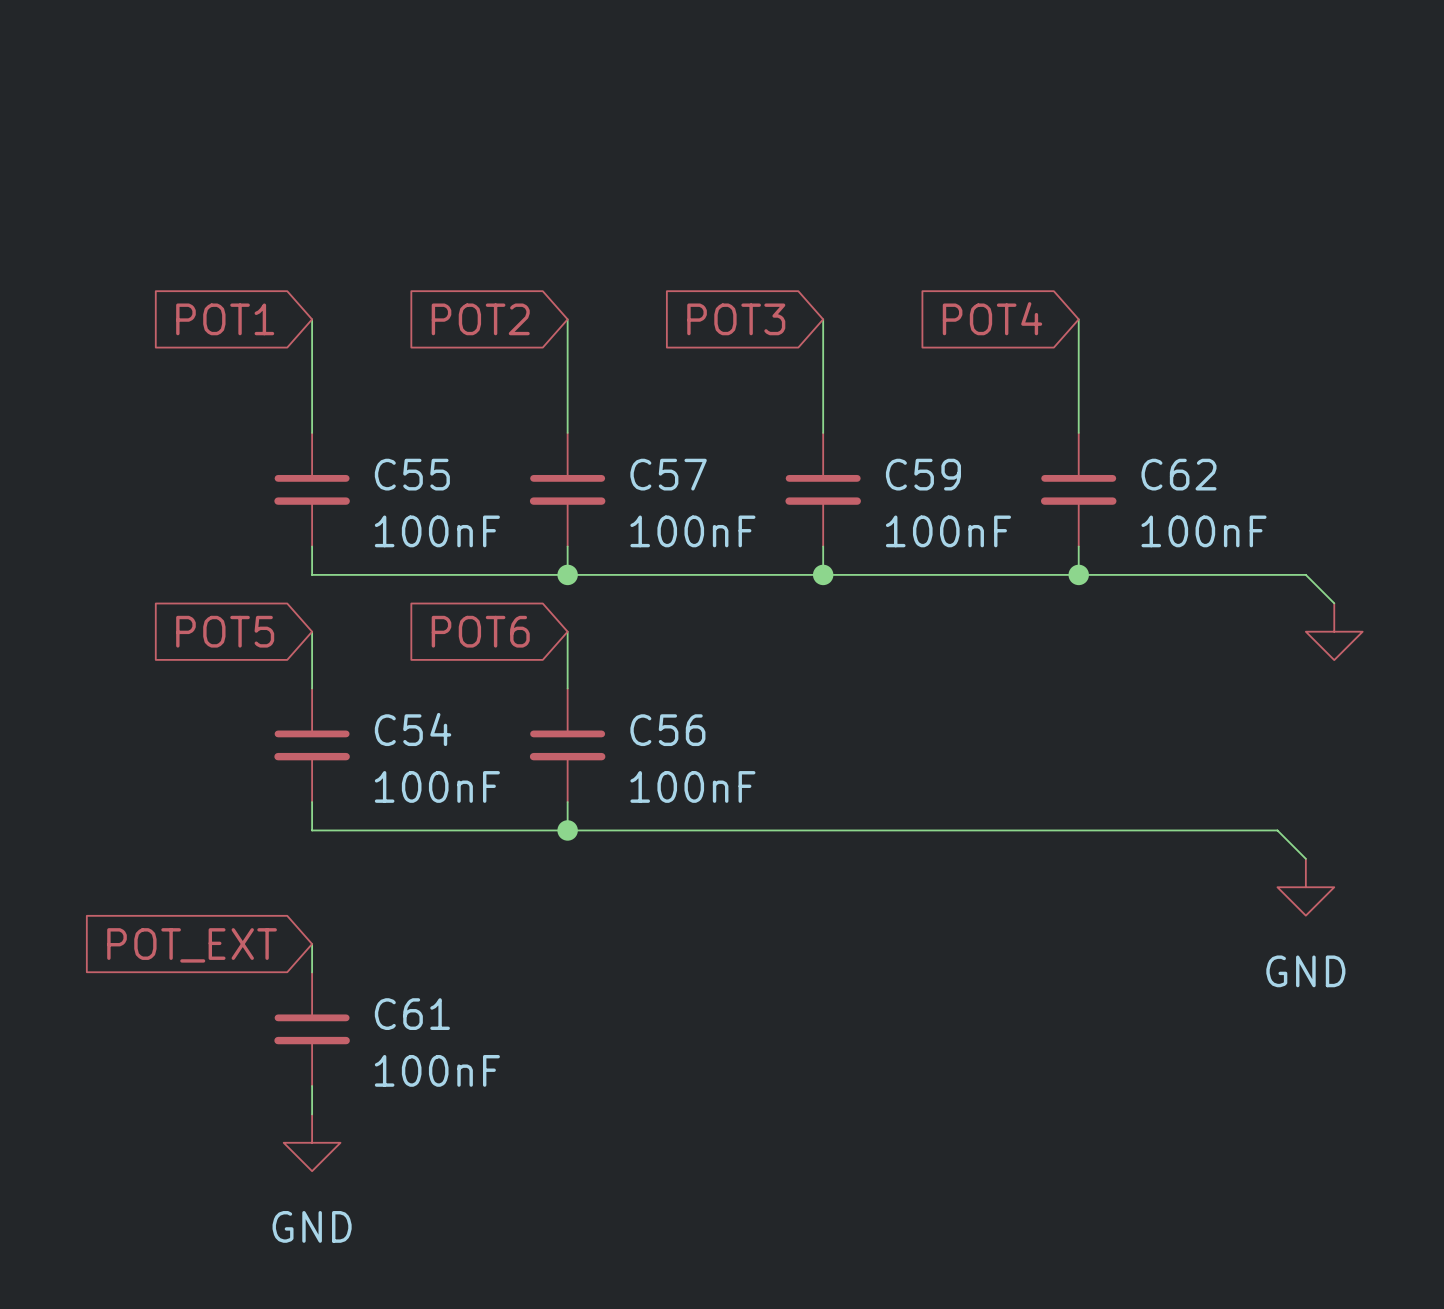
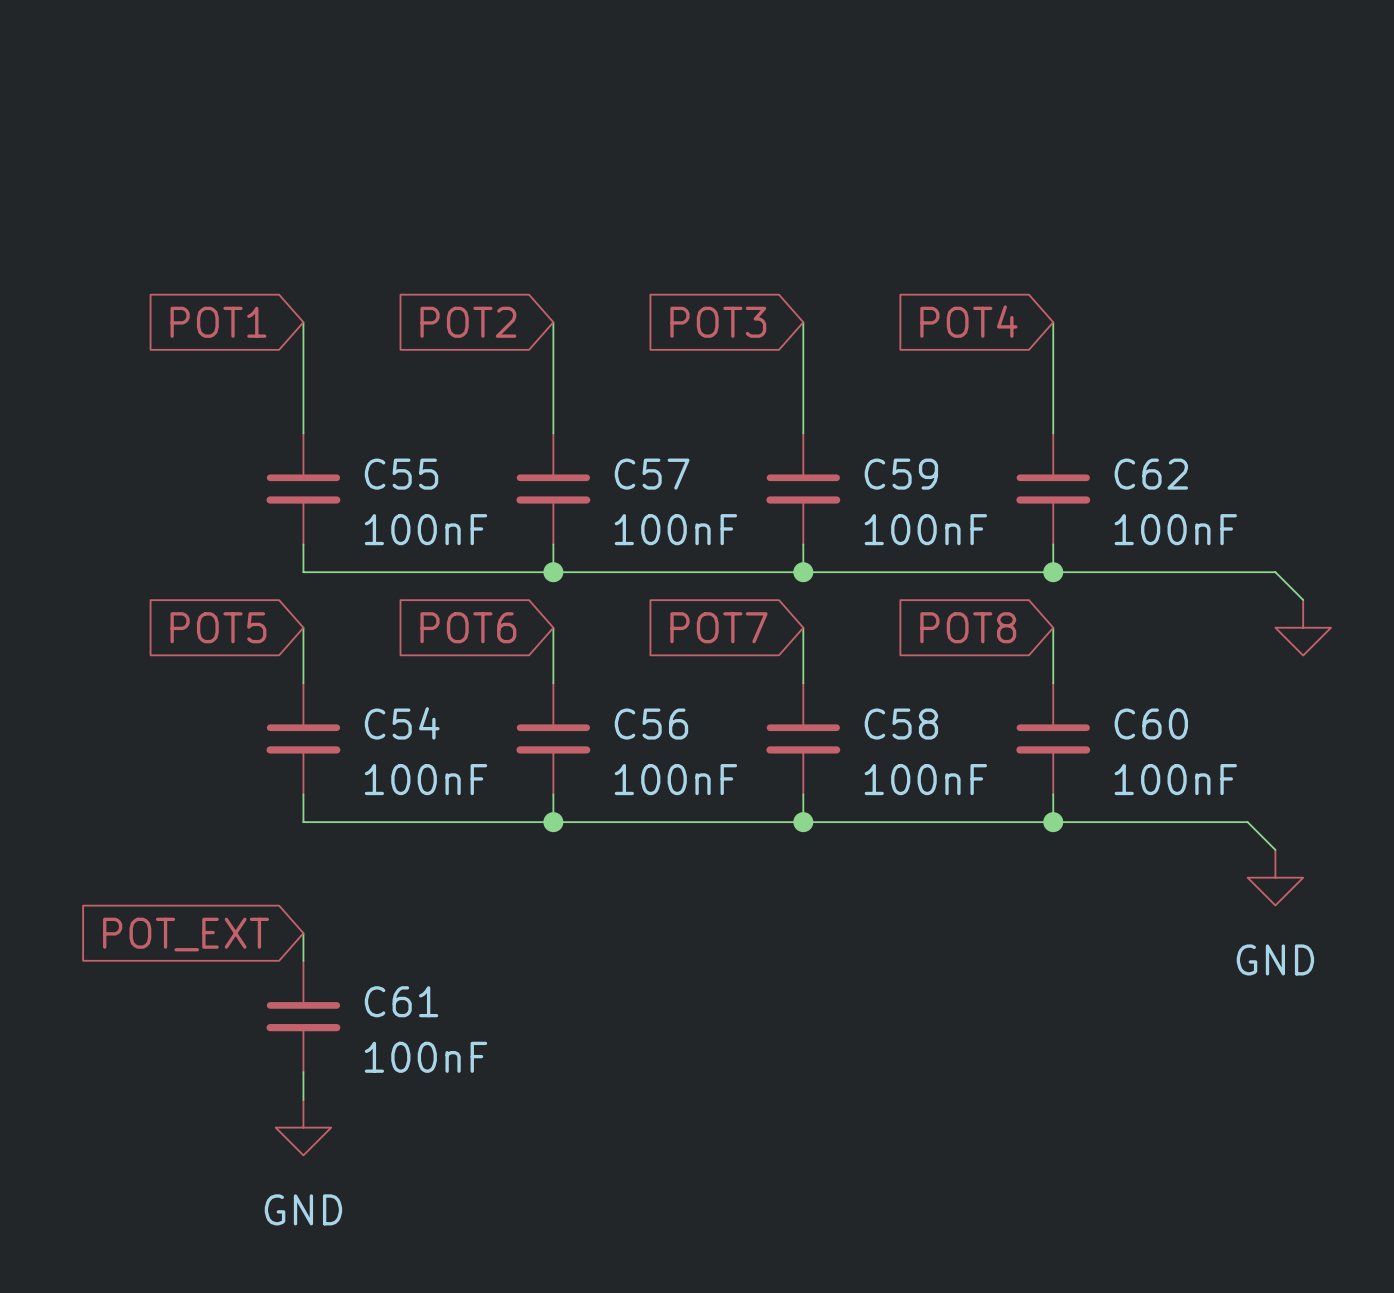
global label: none -> POT7 (718, 627)
wire: none -> (803, 627) (803, 683)
global label: none -> POT8 (968, 627)
wire: none -> (1053, 627) (1053, 683)
C58: none -> 100nF (803, 738)
C60: none -> 100nF (1053, 738)
wire: none -> (803, 794) (803, 822)
wire: none -> (1053, 794) (1053, 822)
junction: none -> (803, 822)
junction: none -> (1053, 822)

